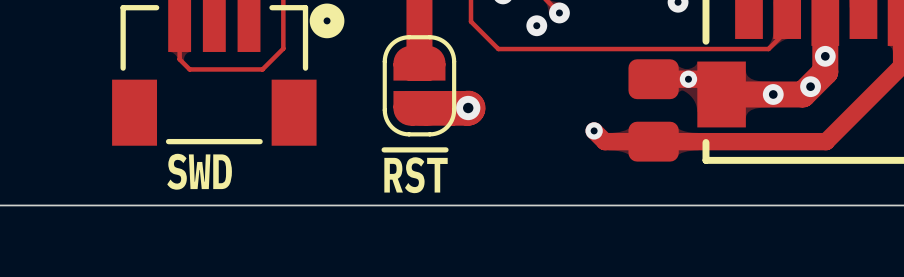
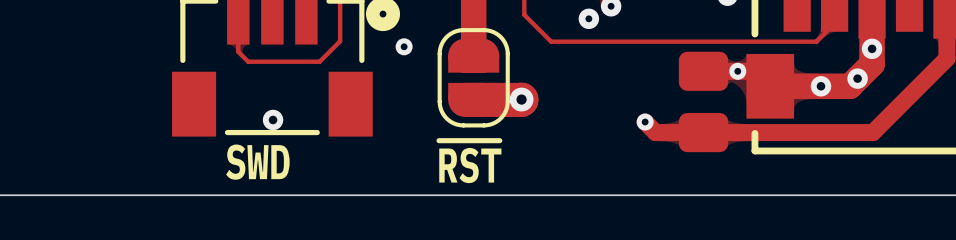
via: none -> (404, 46)
via: none -> (273, 119)

